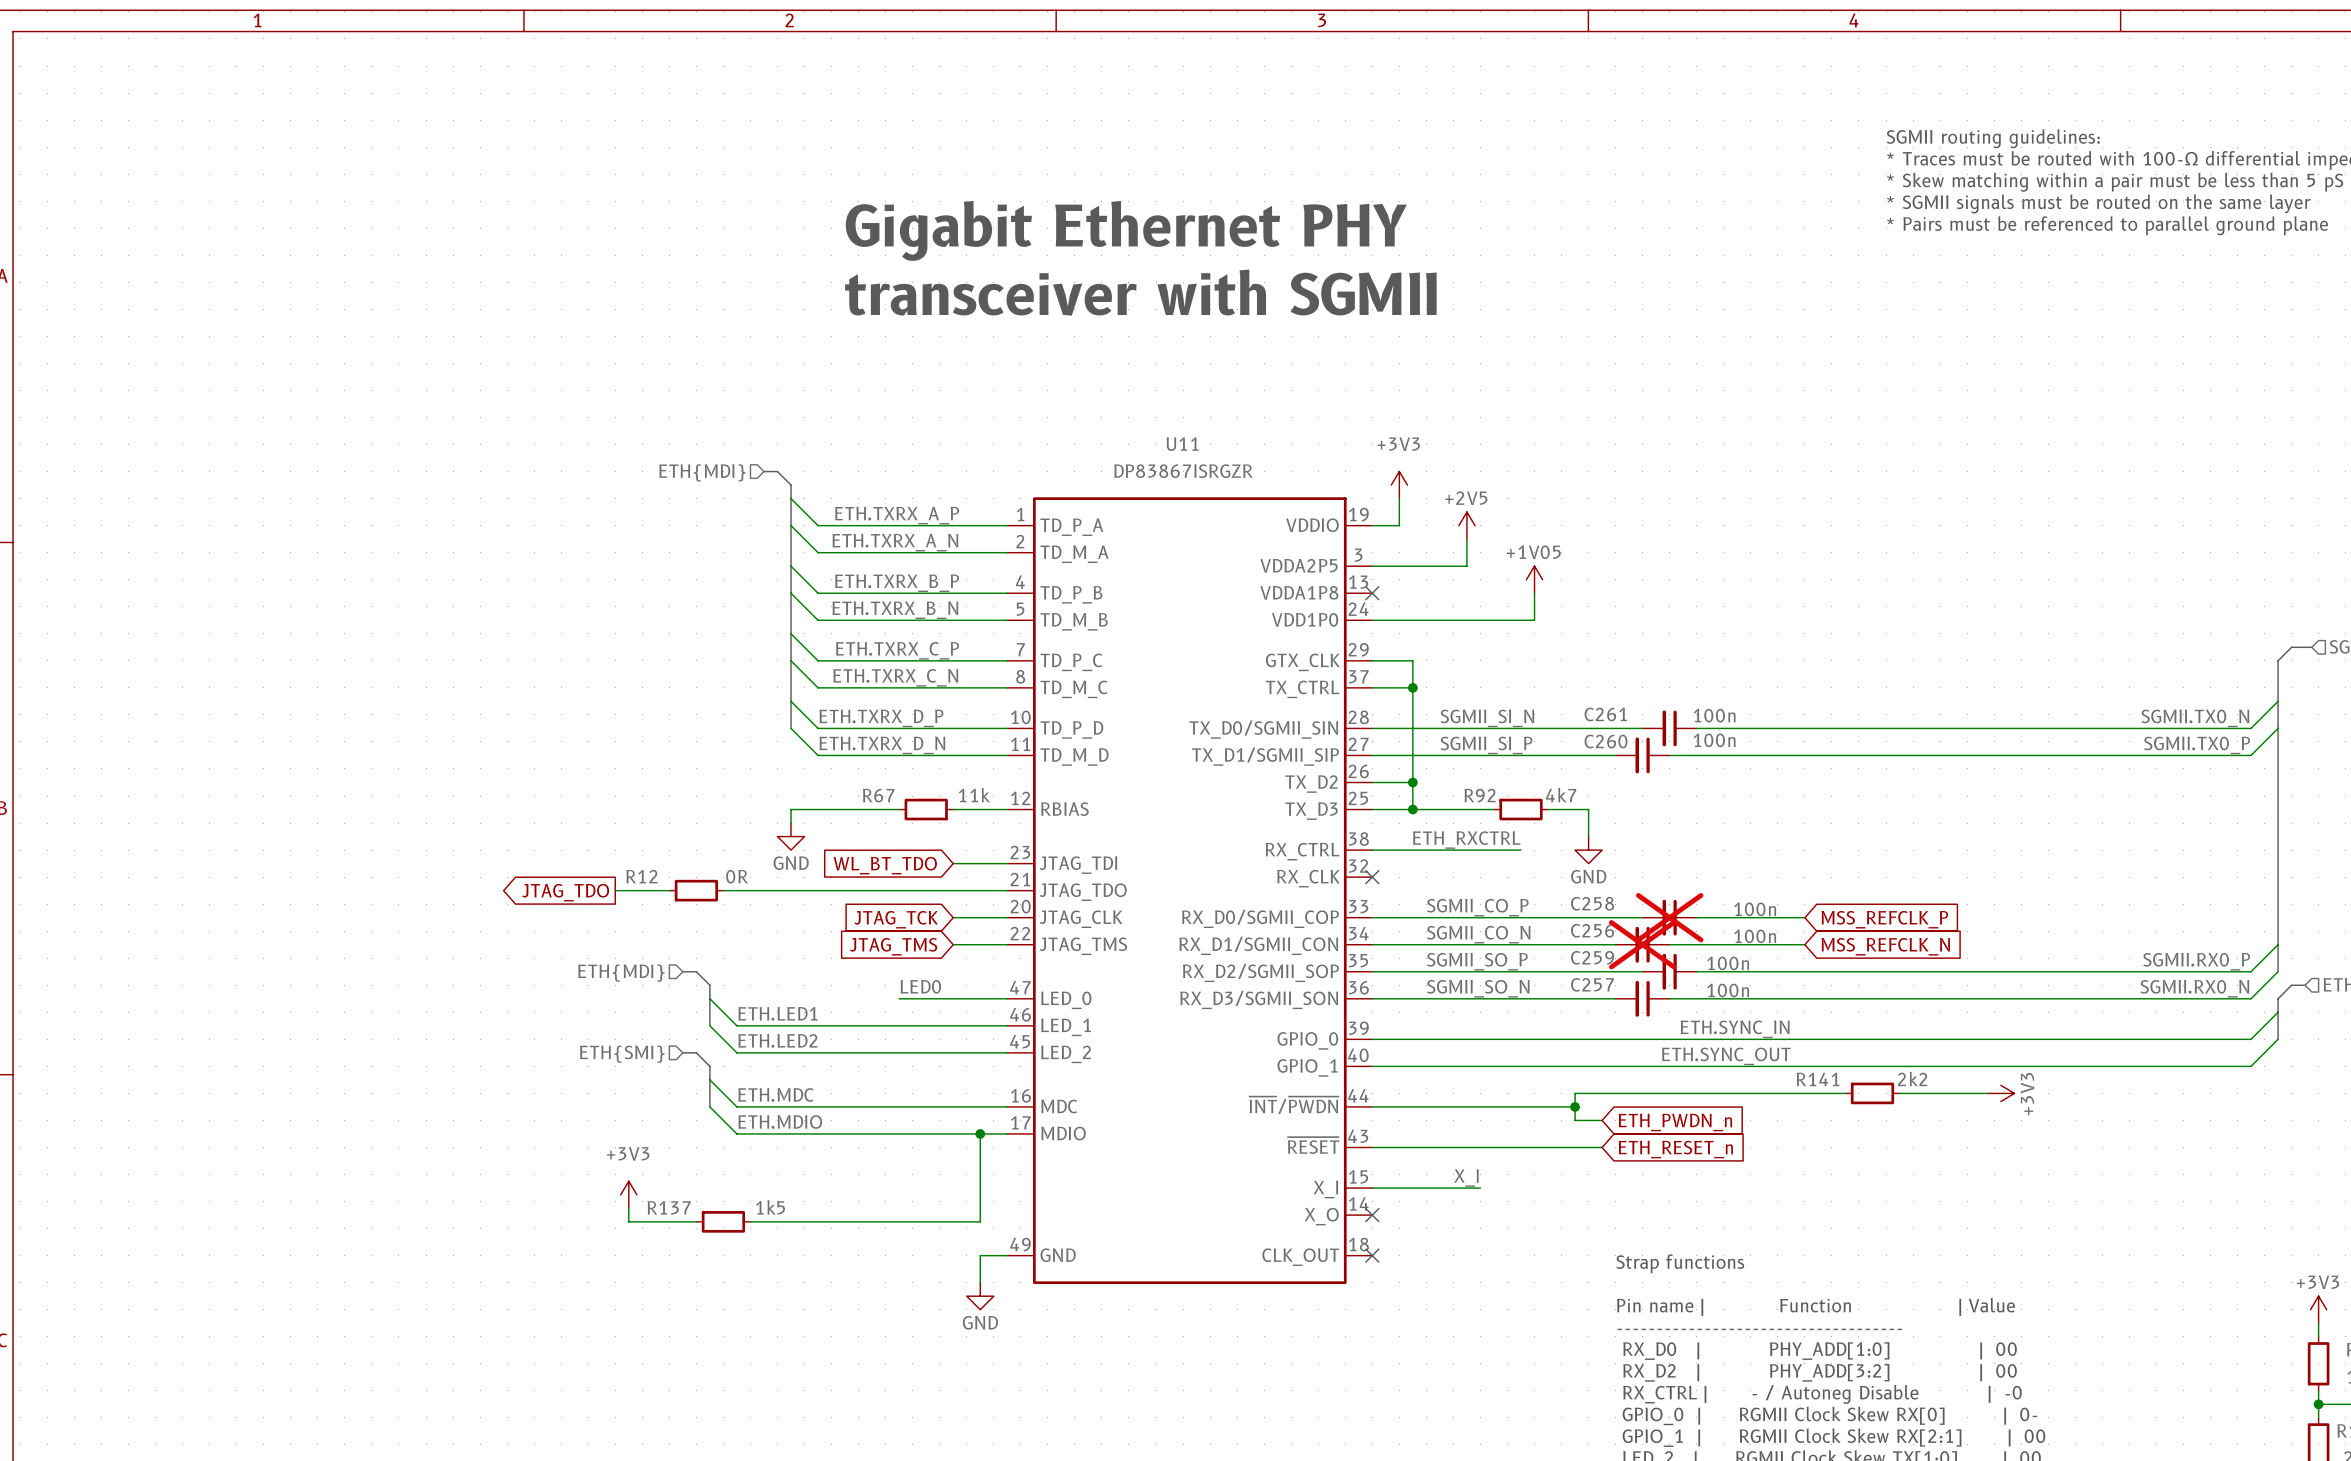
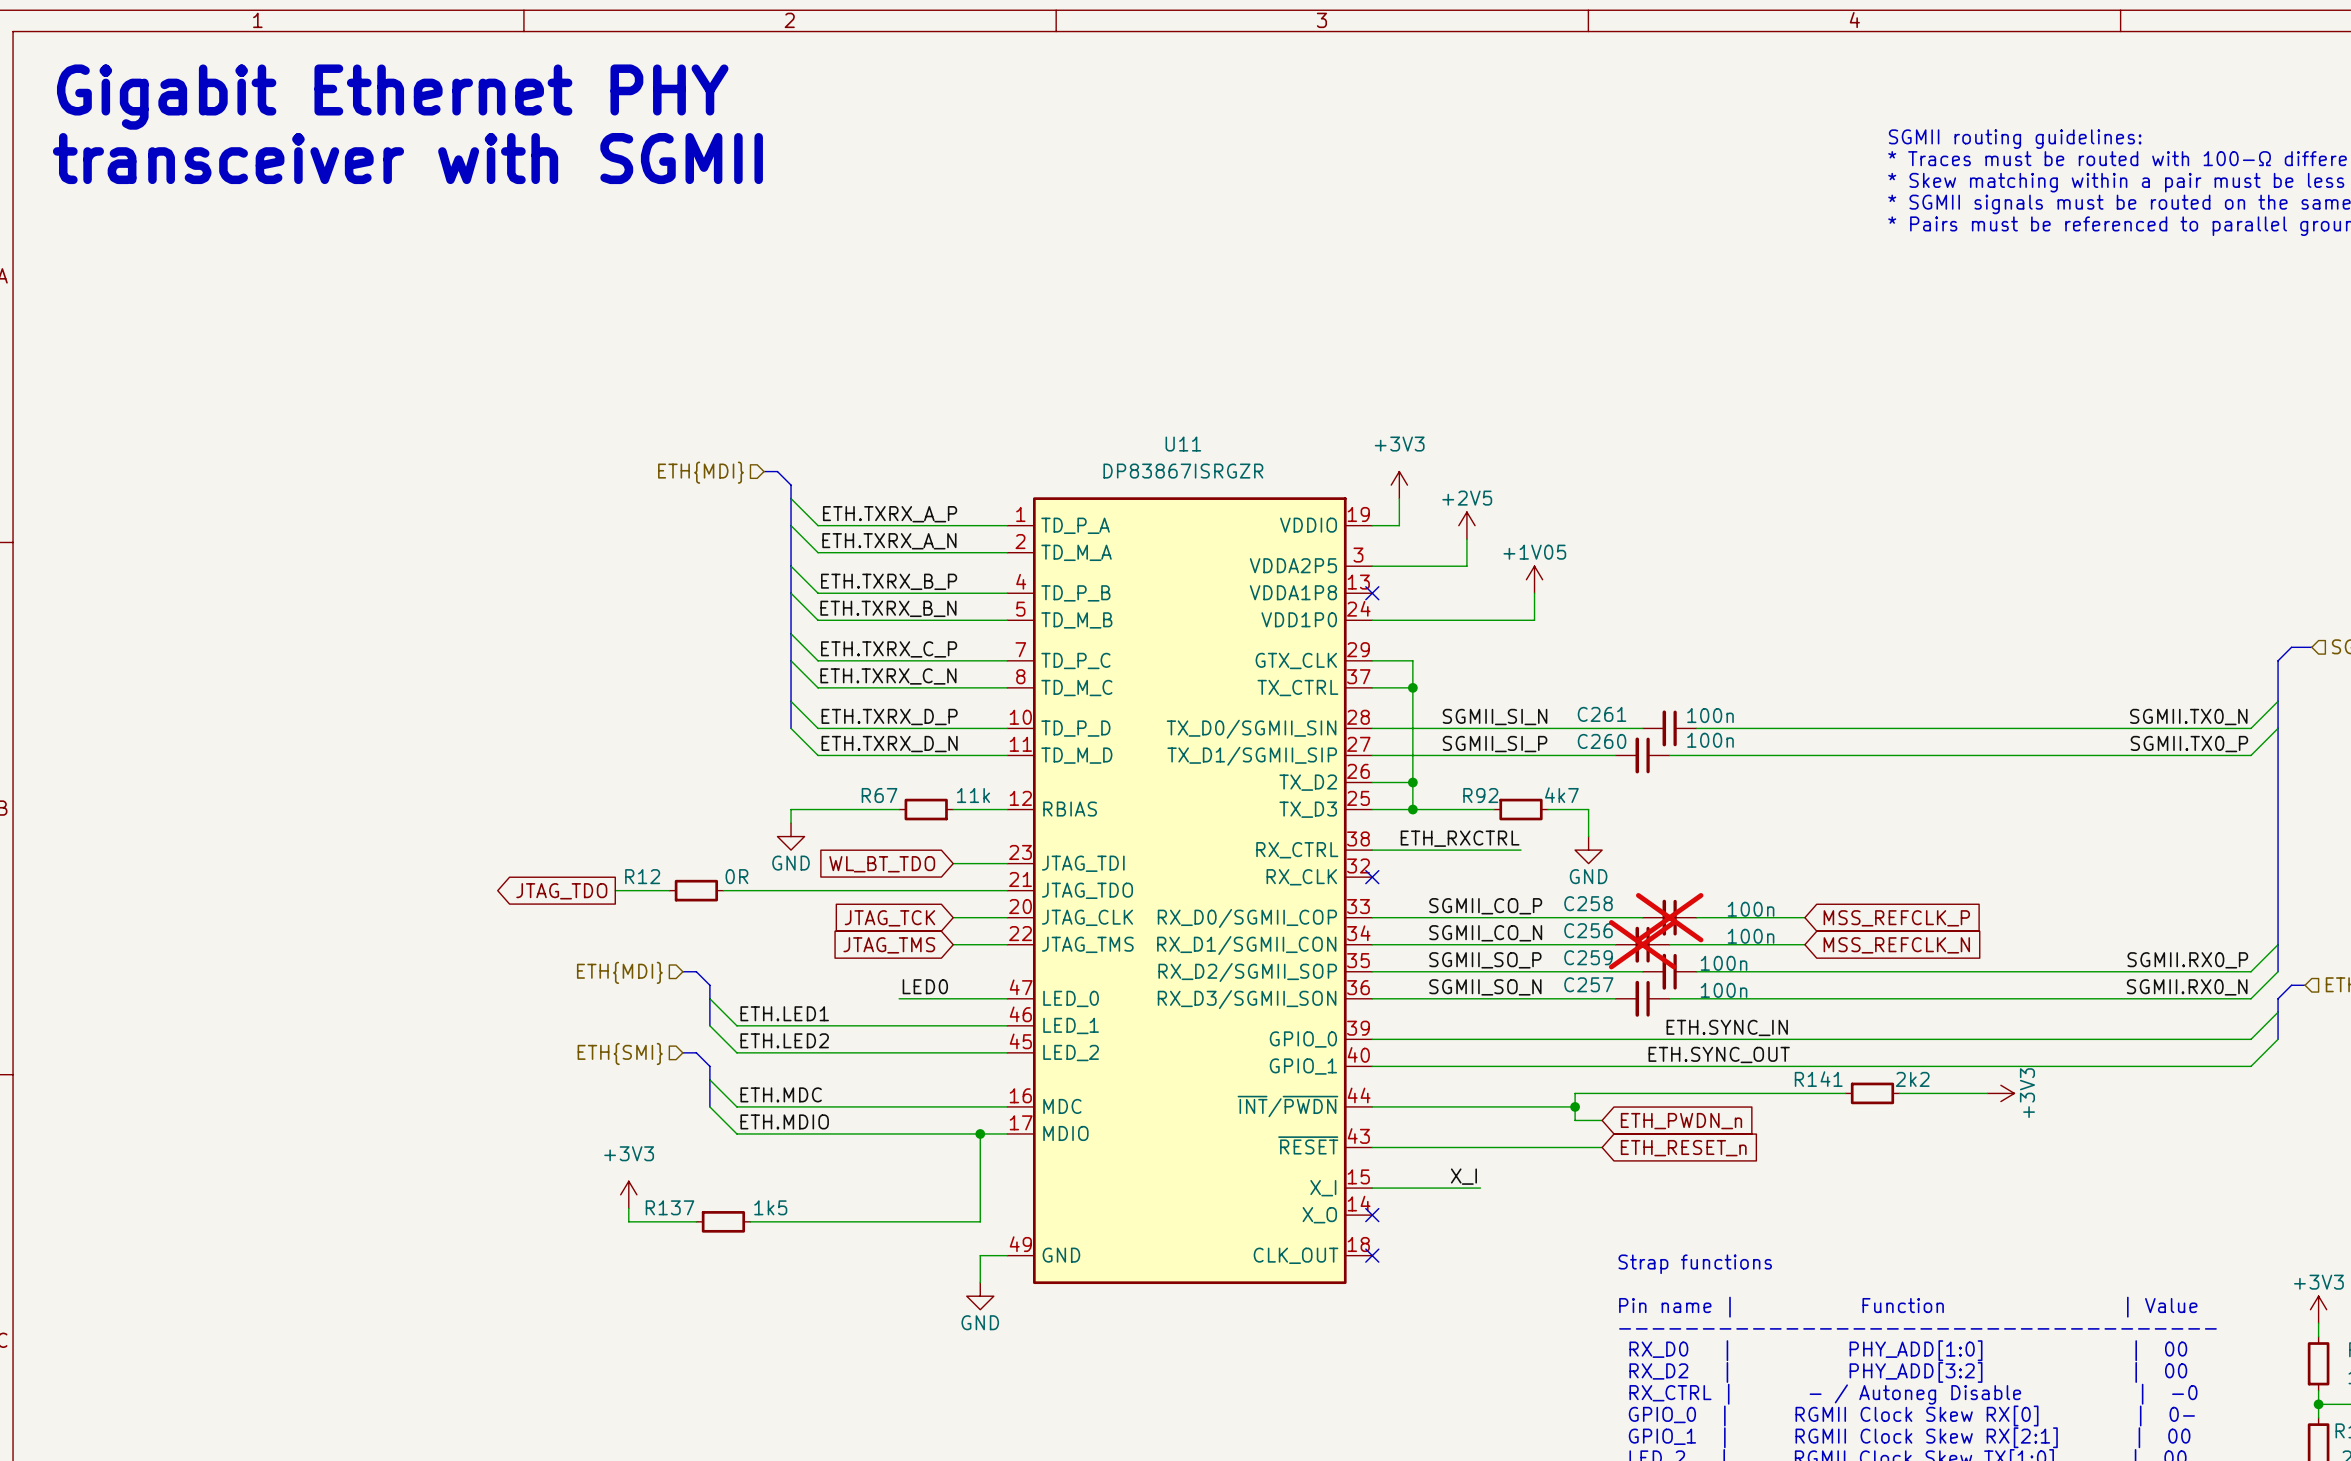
text: none -> Gigabit Ethernet PHY (392, 97)
text: none -> transceiver with SGMII (407, 158)
text: Gigabit Ethernet PHY (1126, 230) -> none
text: transceiver with SGMII (1140, 292) -> none

